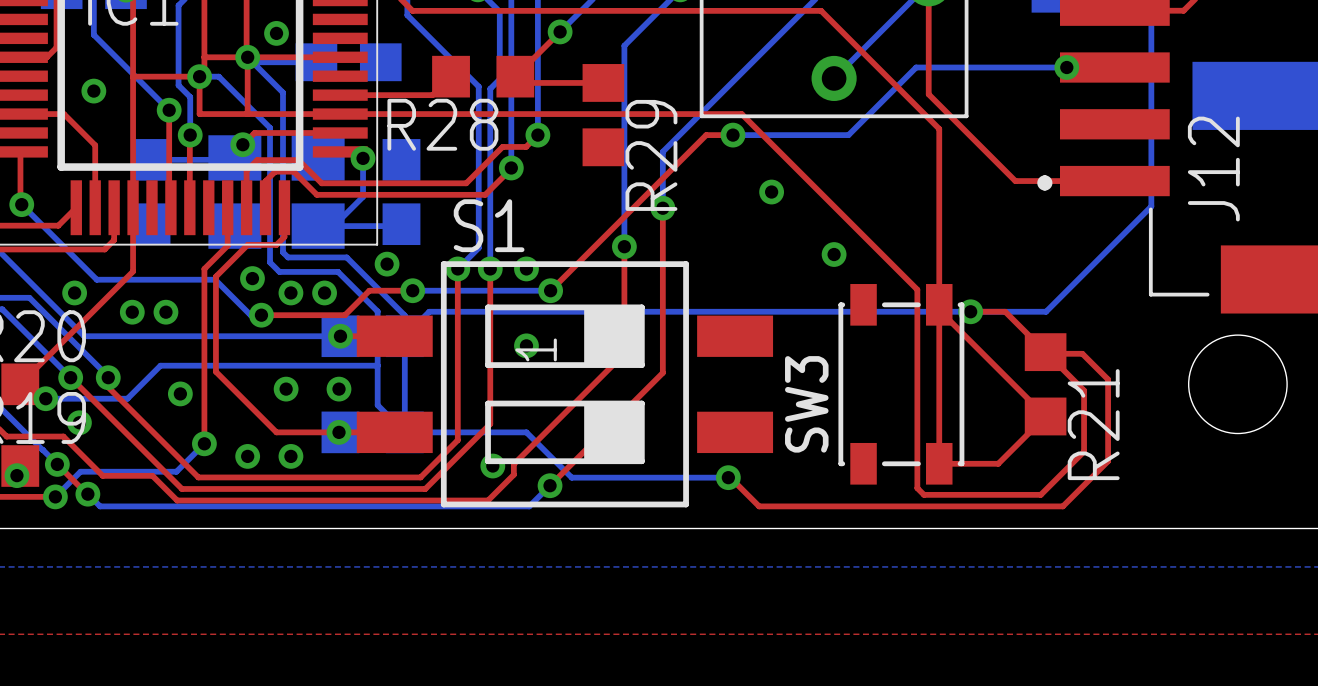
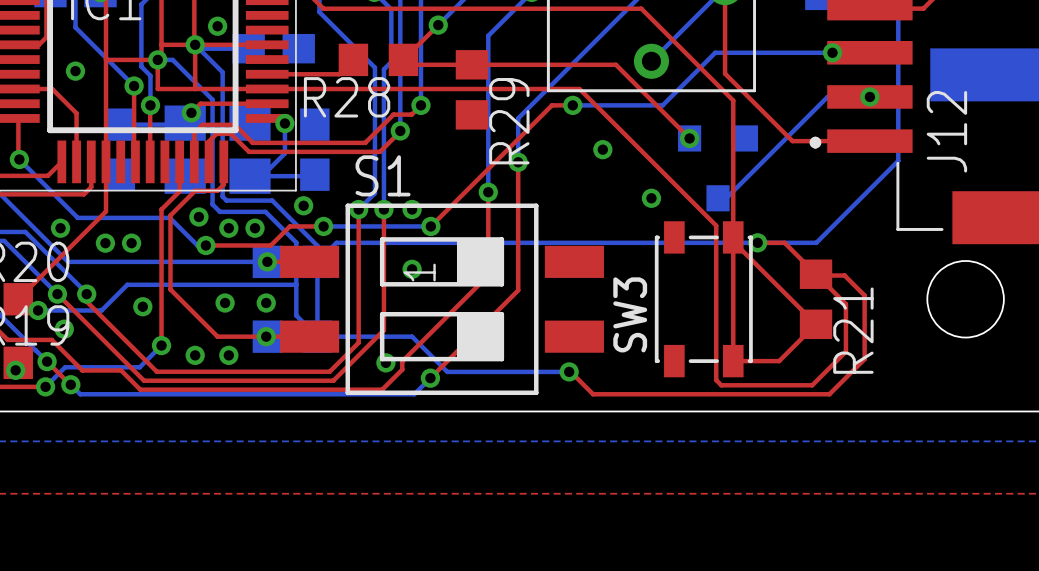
top track: none -> (471, 64) (615, 64) (689, 138)
bottom track: none -> (869, 96) (827, 96) (726, 198) (718, 198)
via: none -> (869, 96)
via: none -> (689, 138)
part: none -> (718, 168)

